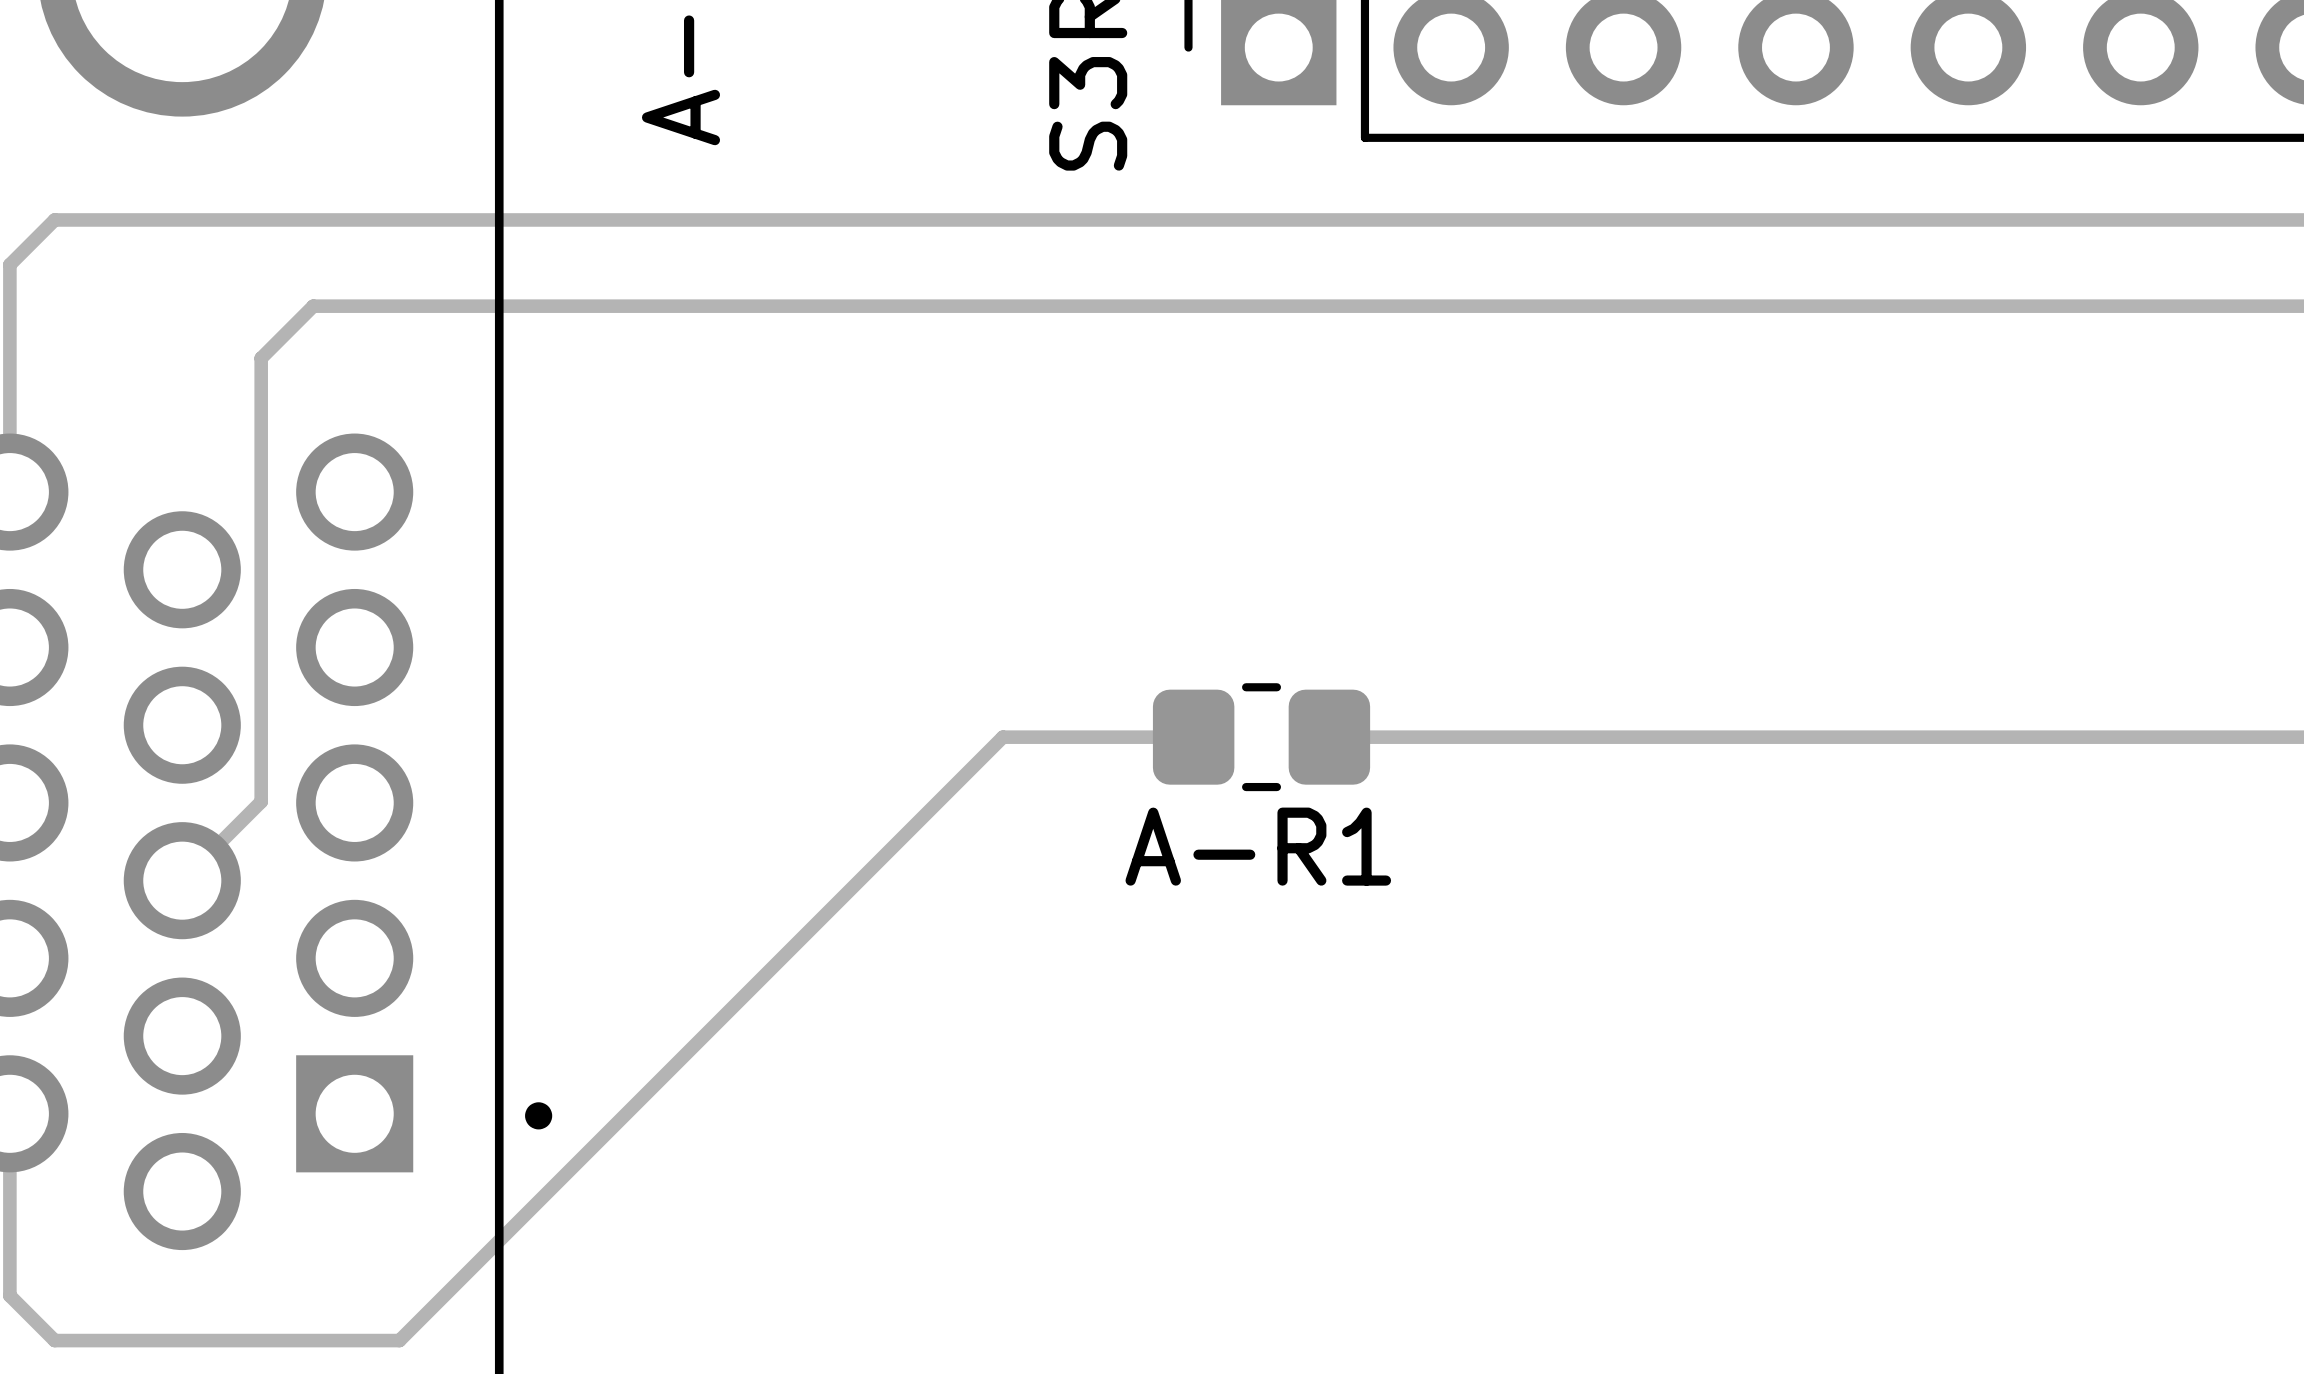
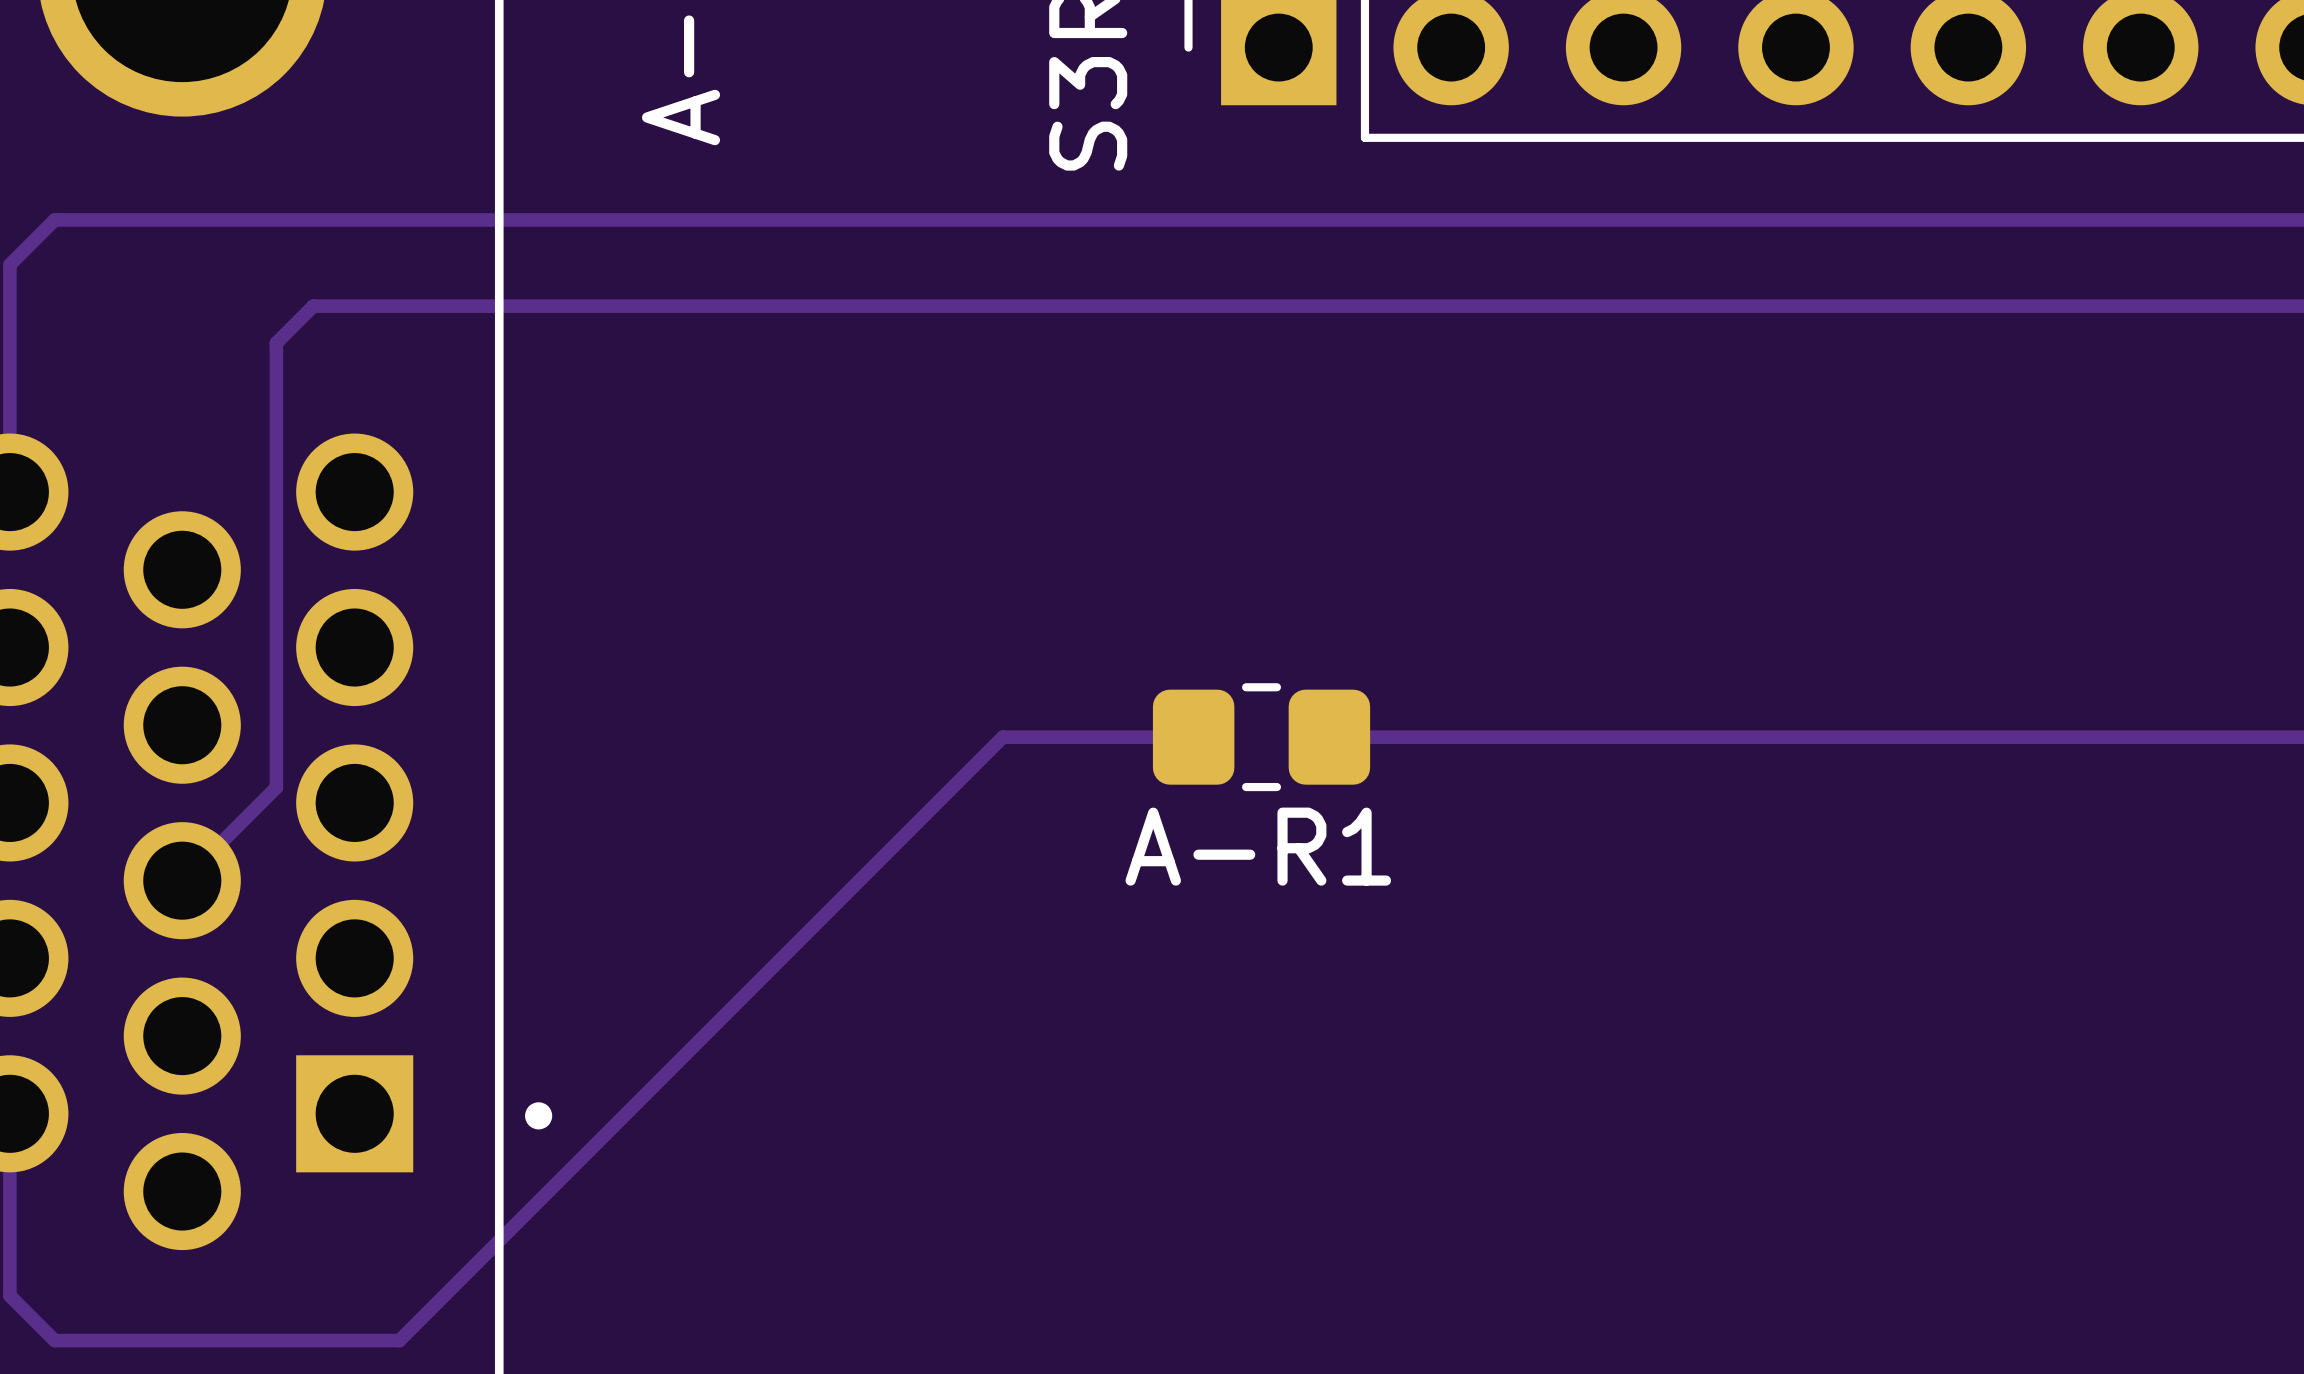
track: (276, 343) (261, 358) (261, 801) (182, 880) -> (276, 343) (276, 787) (182, 881)

